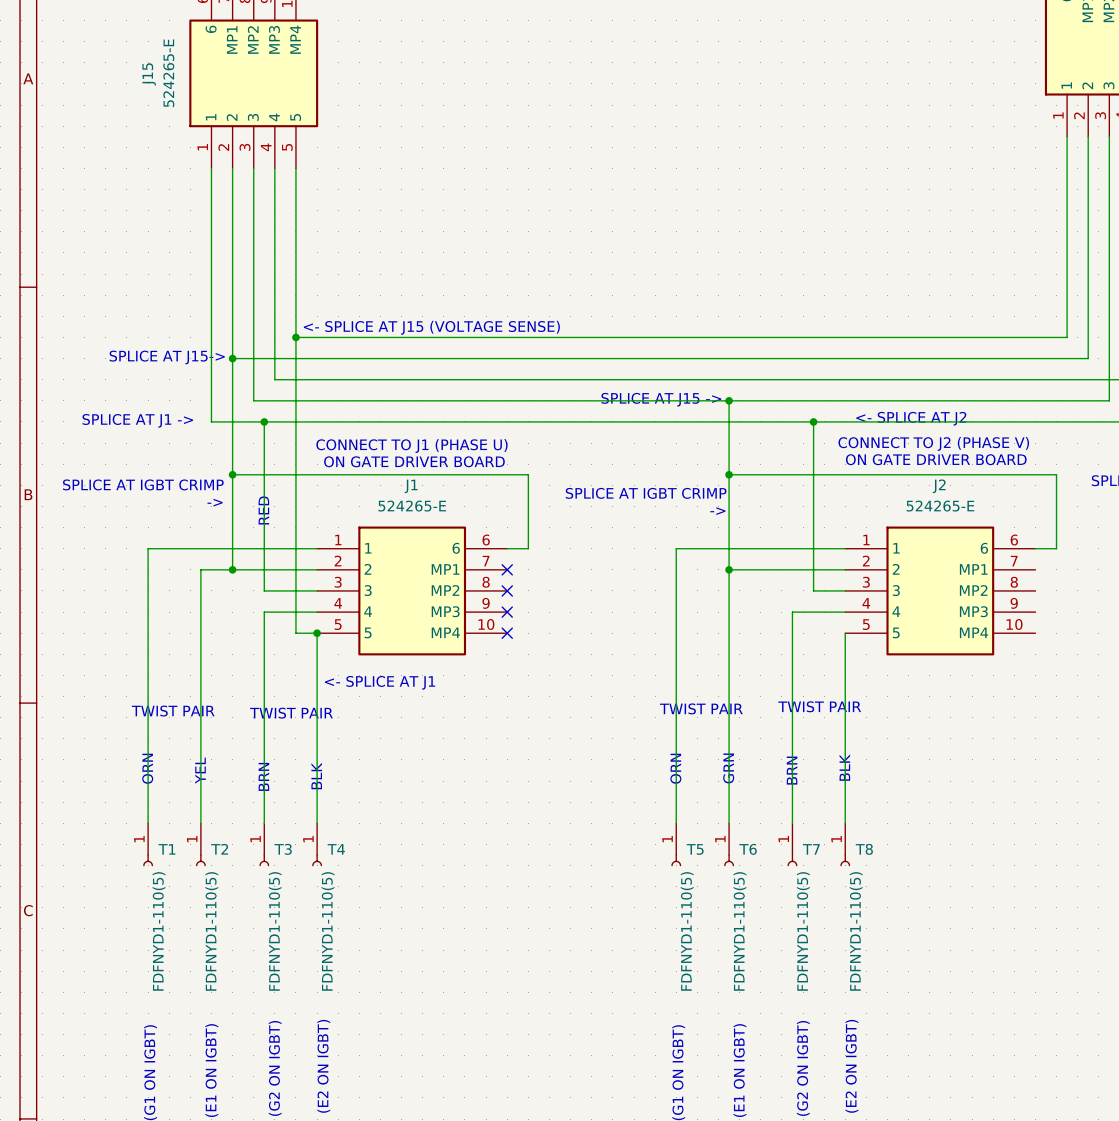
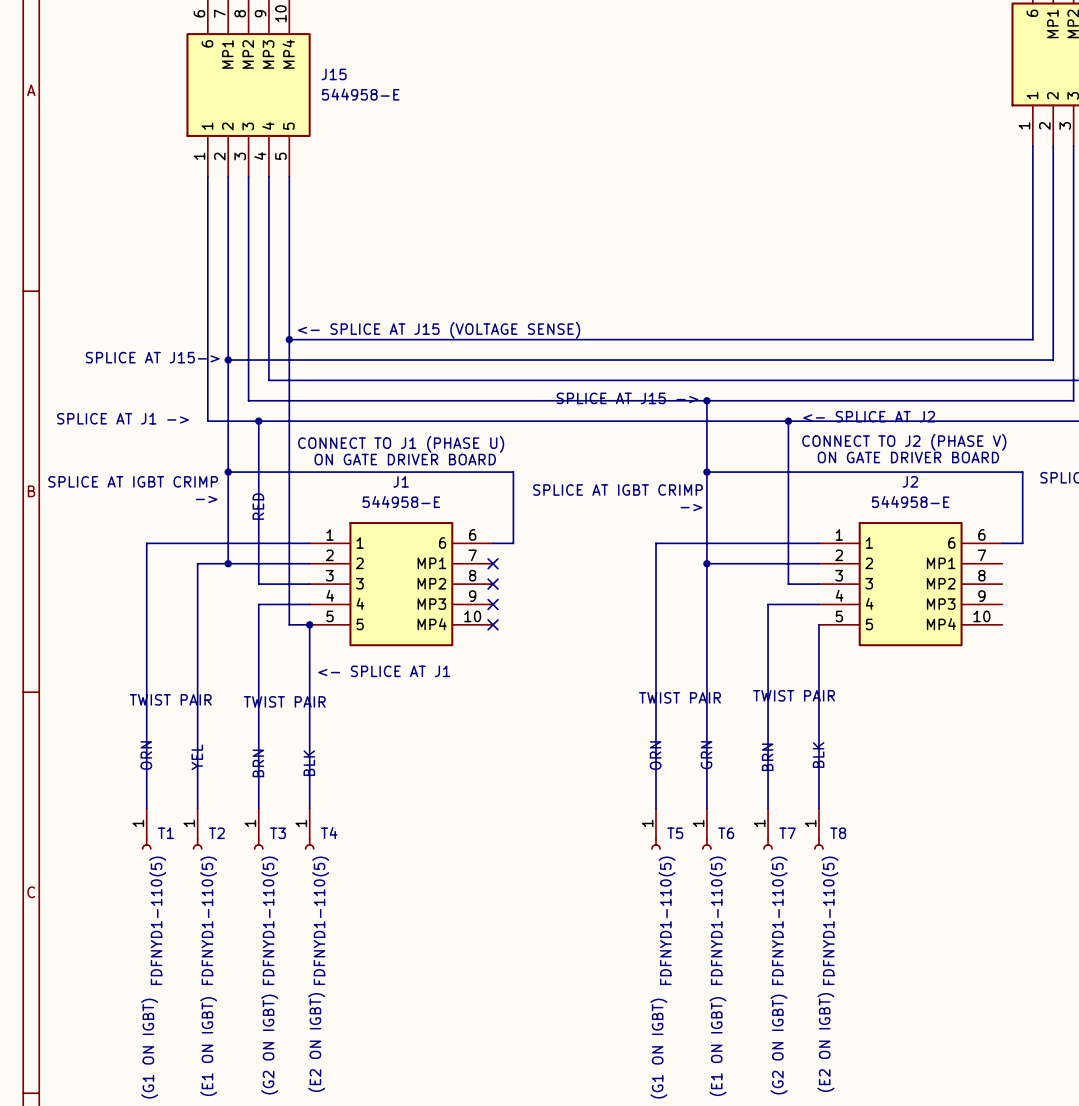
J15 value: 524265-E (168, 73) -> 544958-E (360, 94)
J15 name rotation: 0° (149, 74) -> 90° clockwise (334, 74)
J15 name position: J15 (149, 74) -> J15 (334, 74)
J1 value: 524265-E (412, 506) -> 544958-E (401, 502)
J2 value: 524265-E (940, 506) -> 544958-E (910, 502)

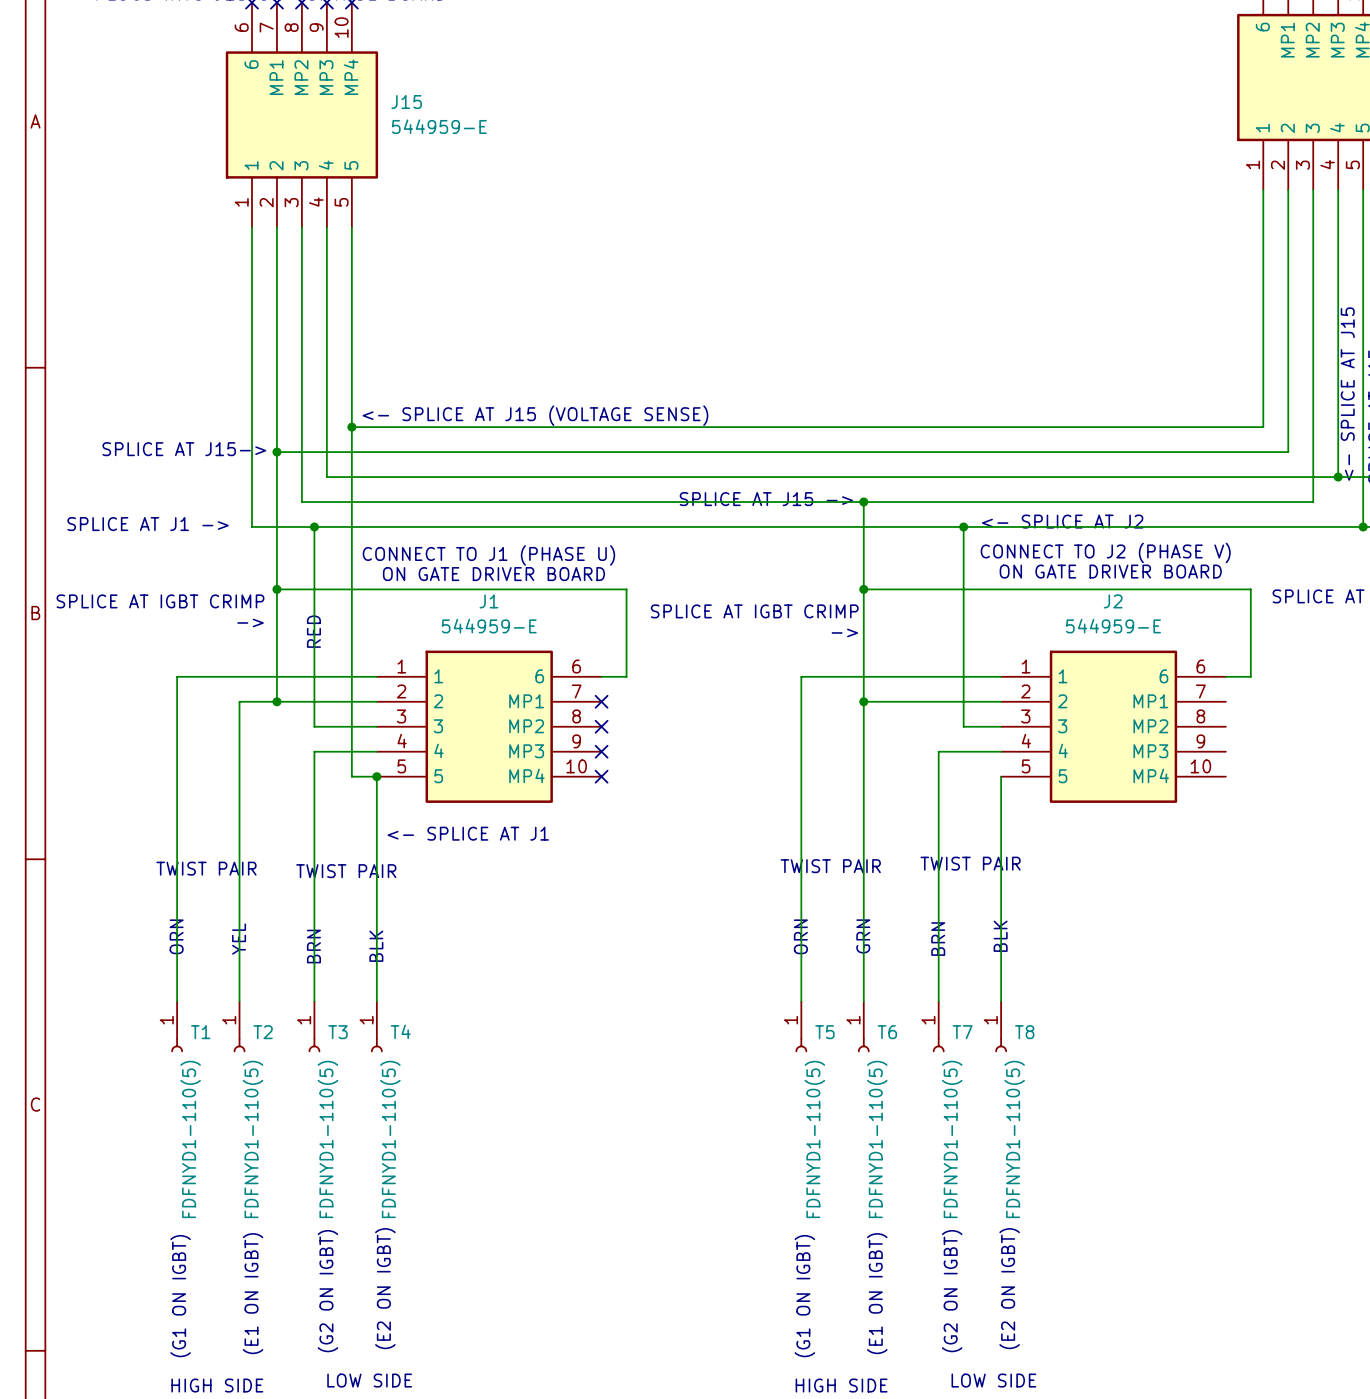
J15 value: 544958-E (360, 94) -> 544959-E (439, 126)
J1 value: 544958-E (401, 502) -> 544959-E (489, 626)
J2 value: 544958-E (910, 502) -> 544959-E (1113, 626)

